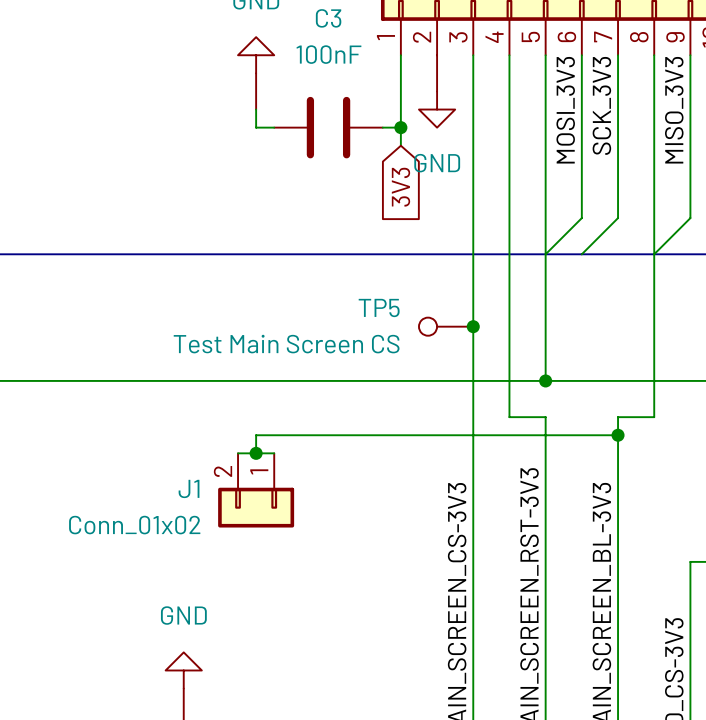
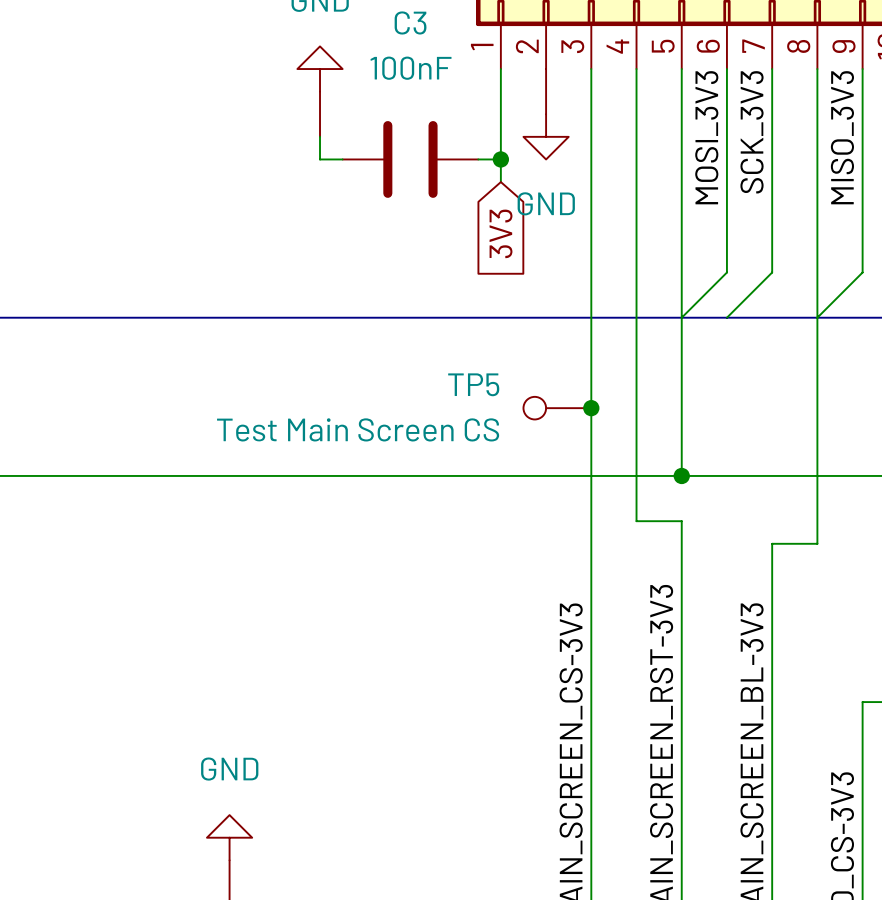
wire: (654, 417) (618, 417) (618, 435) (256, 435) (256, 453) -> (817, 521) (817, 543) (772, 543)
junction: (618, 435) -> none
wire: (238, 453) (274, 453) -> none
junction: (256, 453) -> none
J1: Conn_01x02 (256, 490) -> none

